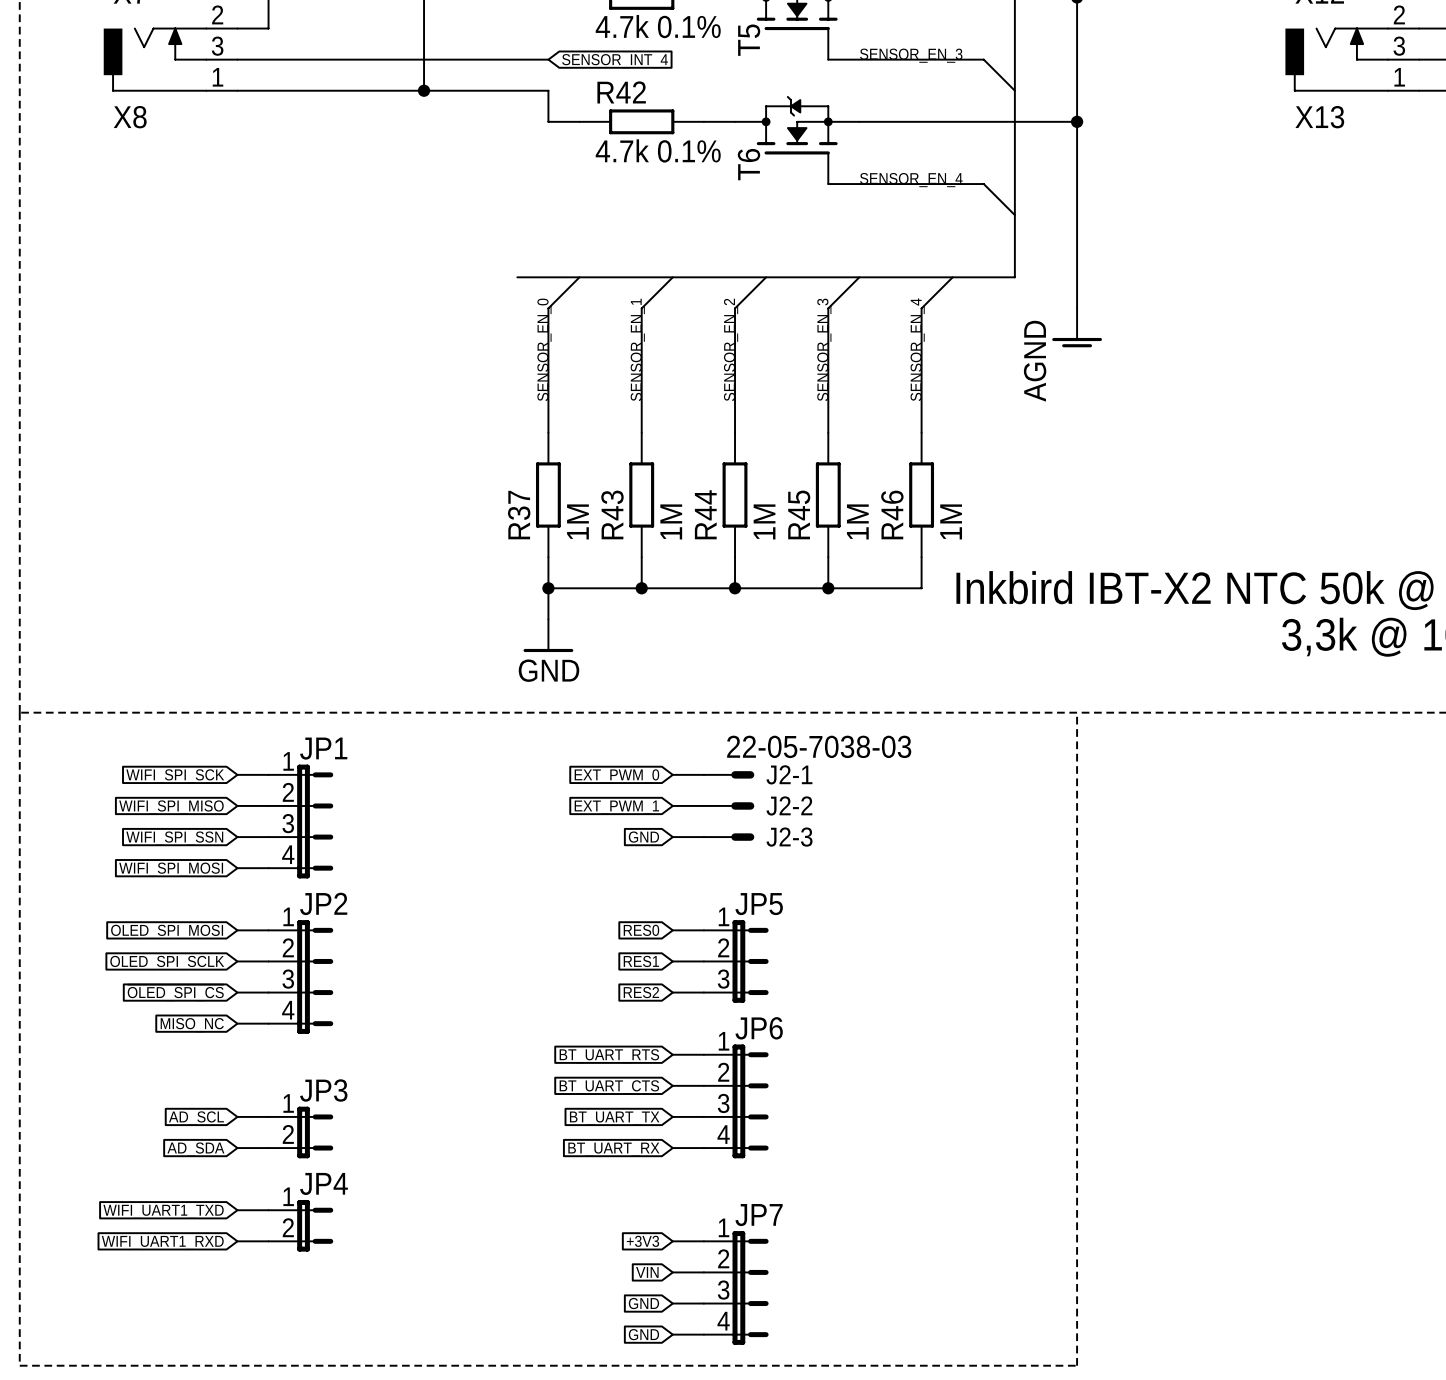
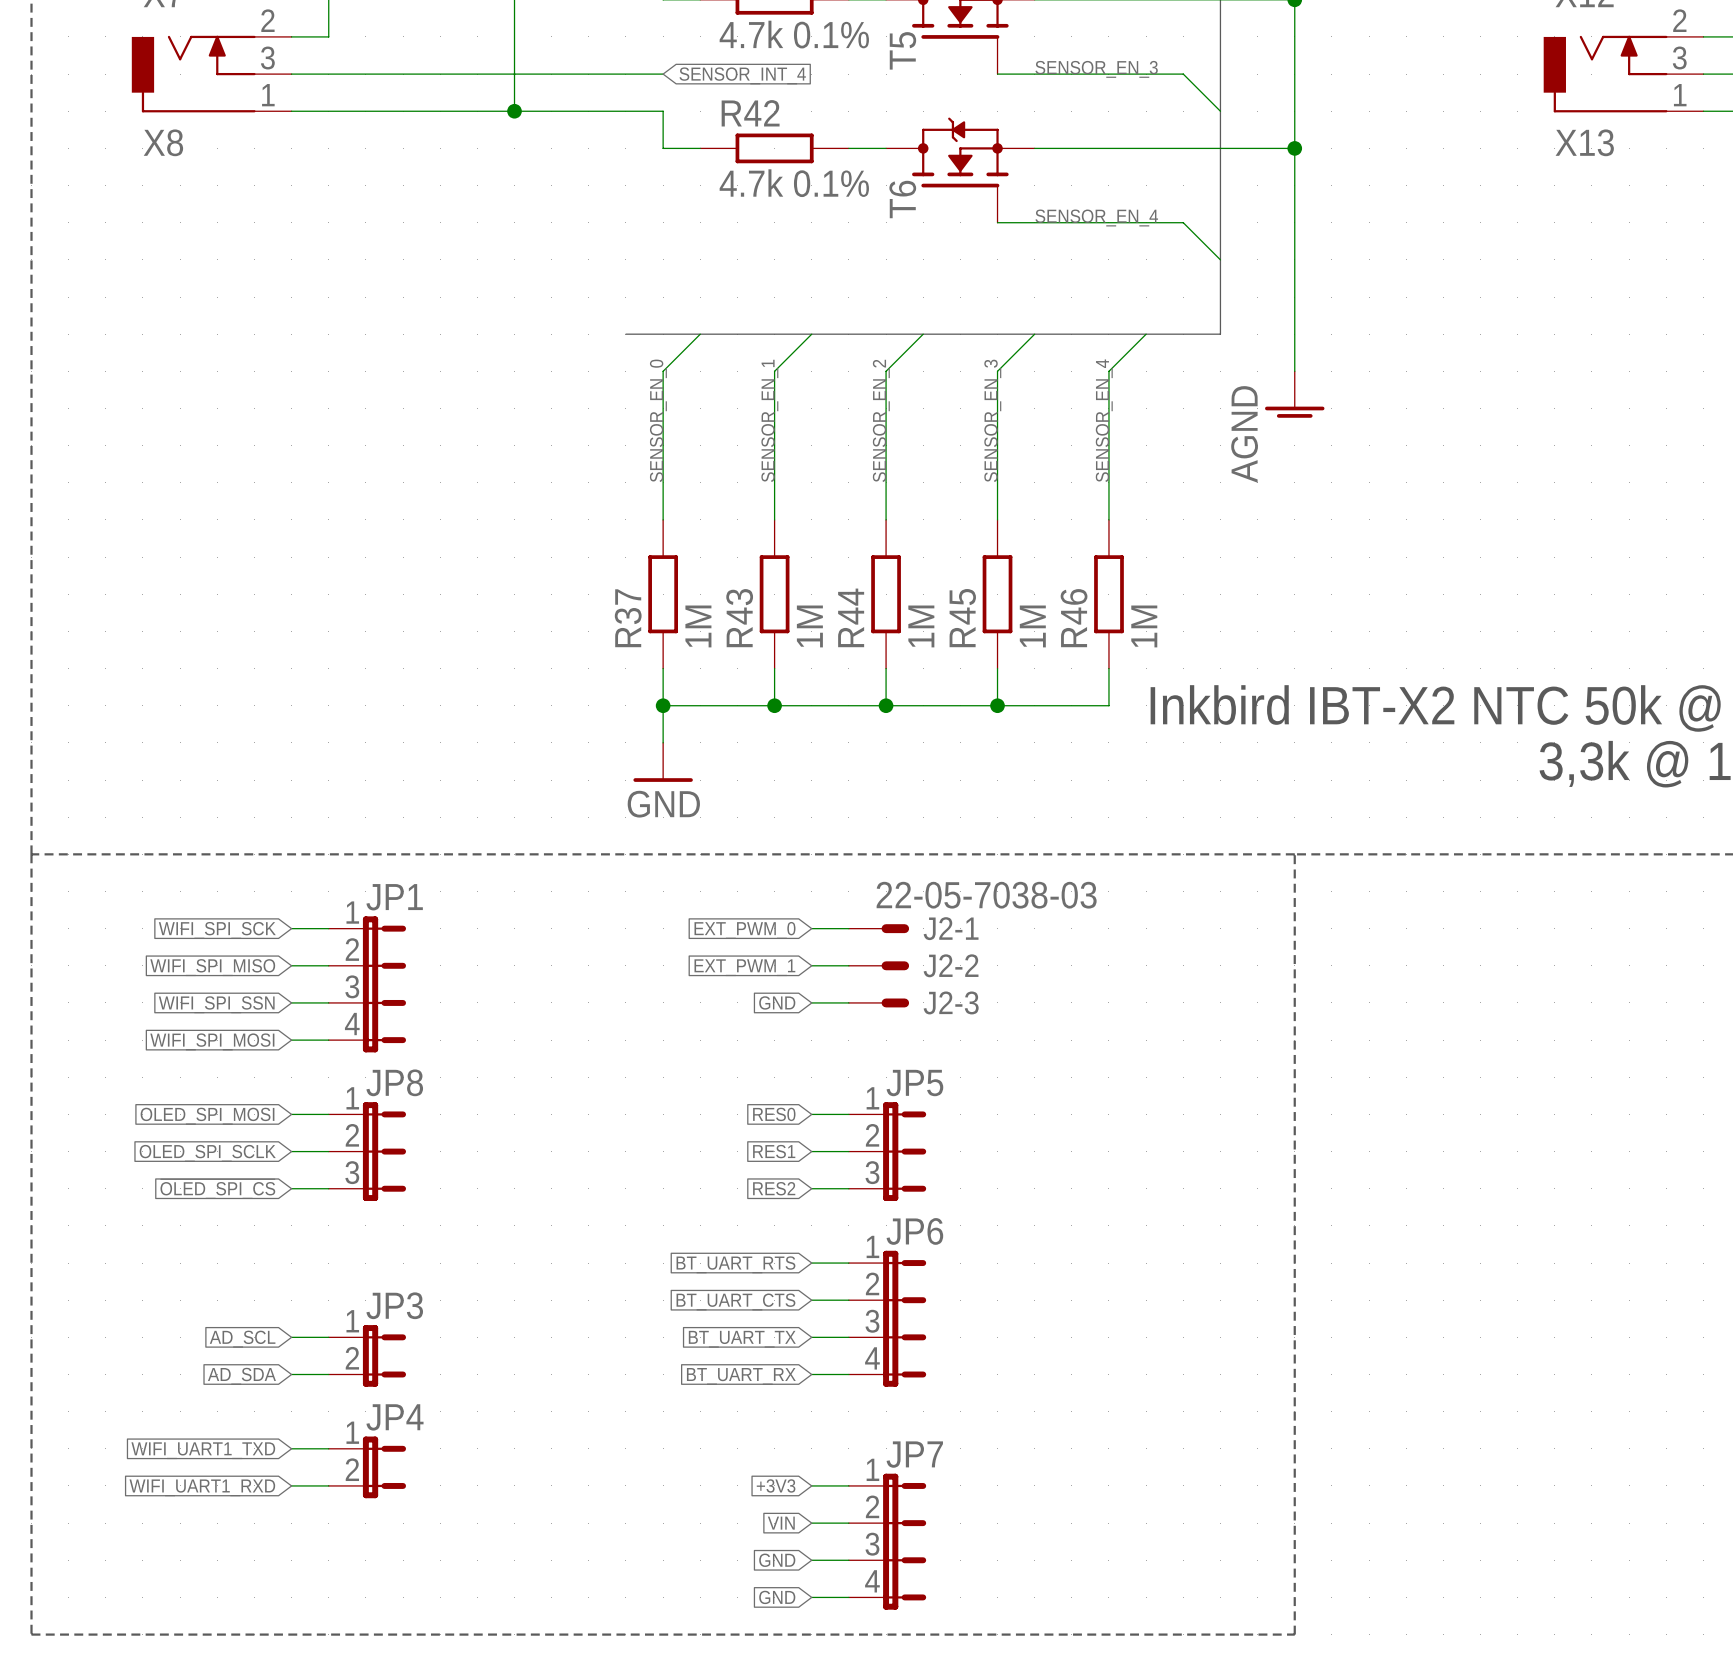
JP8: none -> (367, 1151)
JP2: (300, 977) -> none
wire: (237, 1023) (268, 1023) -> none
global label: MISO_NC (192, 1025) -> none

